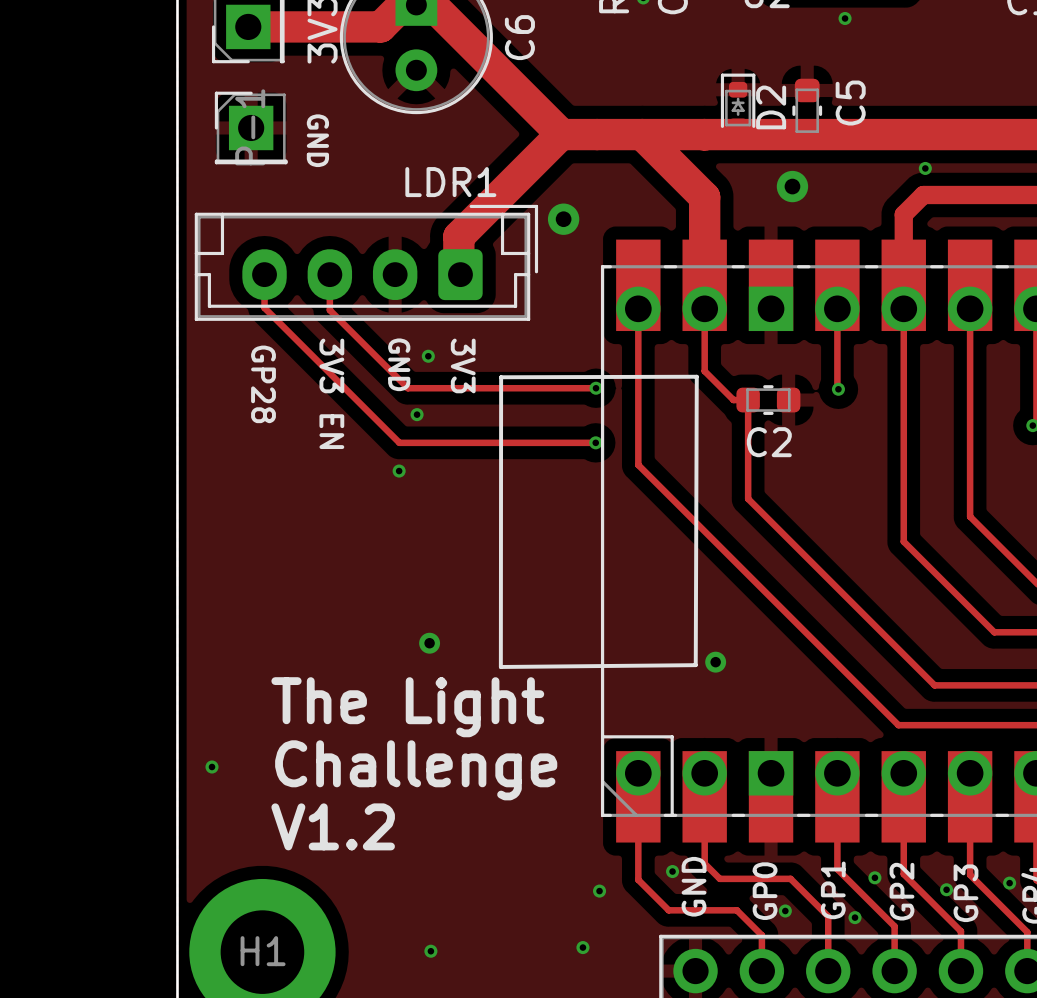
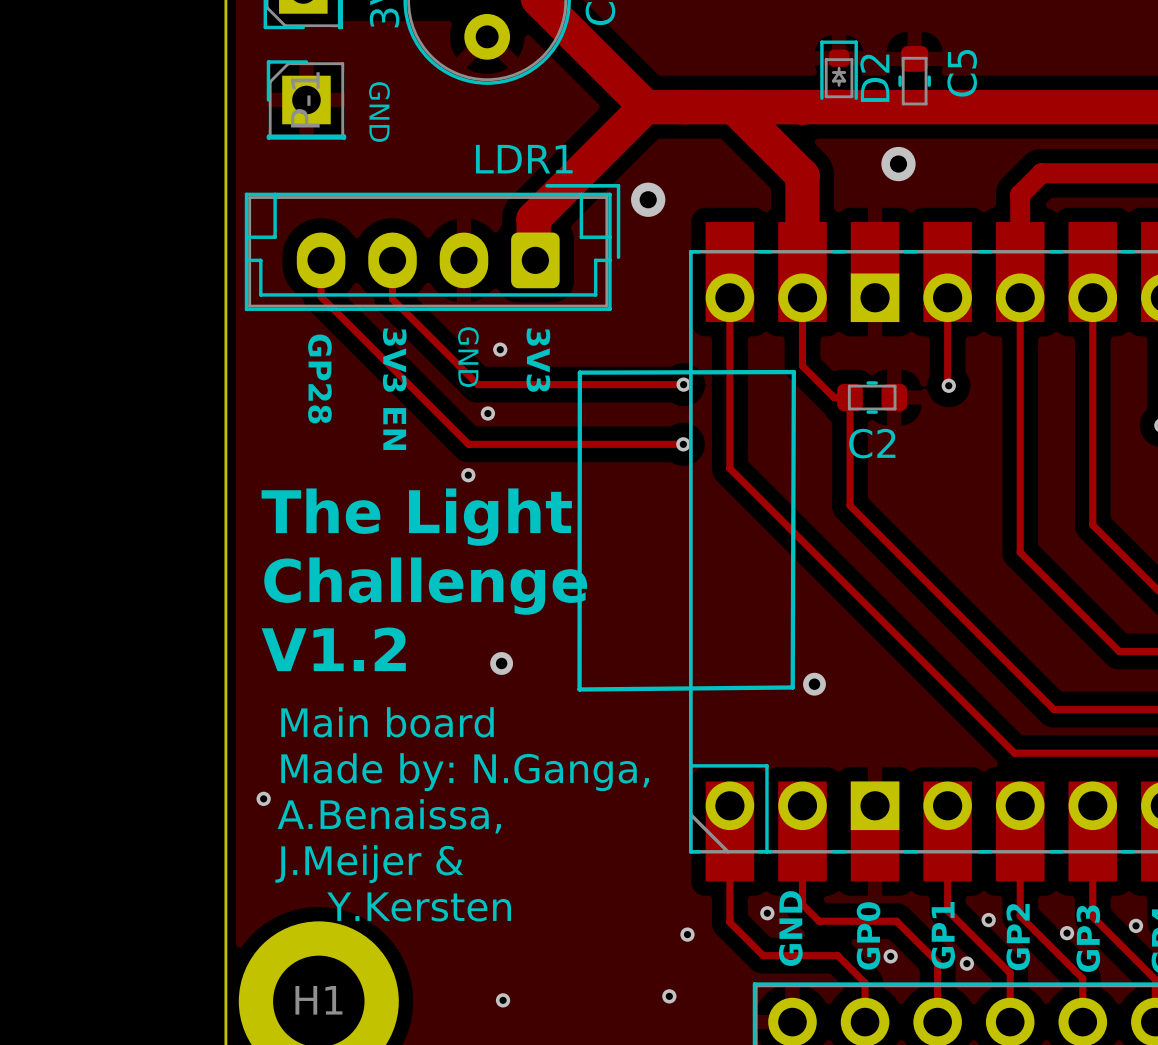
via: (925, 168) -> none
text: none -> Main board (387, 722)
text position: The Light (407, 707) -> The Light (416, 517)
text: none -> Made by: N.Ganga, (465, 772)
text position: Challenge (416, 770) -> Challenge (425, 586)
text: none -> A.Benaissa, (389, 816)
text position: V1.2 (333, 826) -> V1.2 (333, 649)
text: none -> J.Meijer & (369, 864)
text: none -> Y.Kersten (419, 906)

